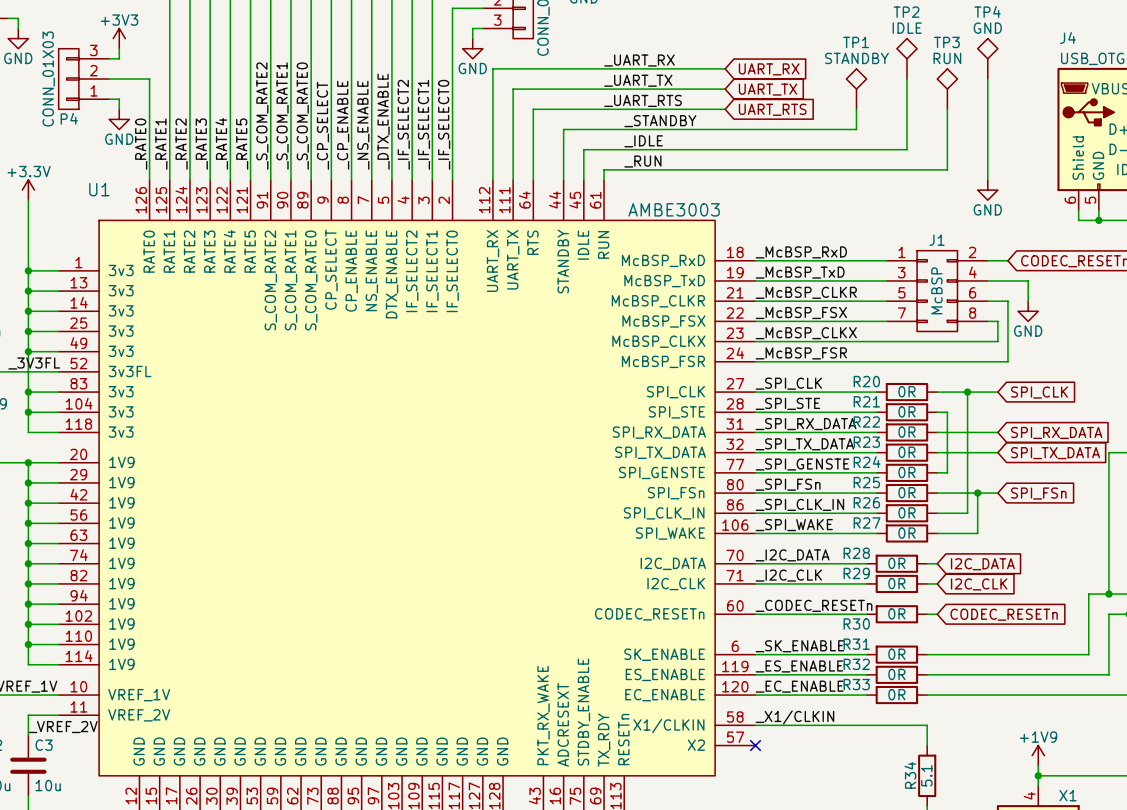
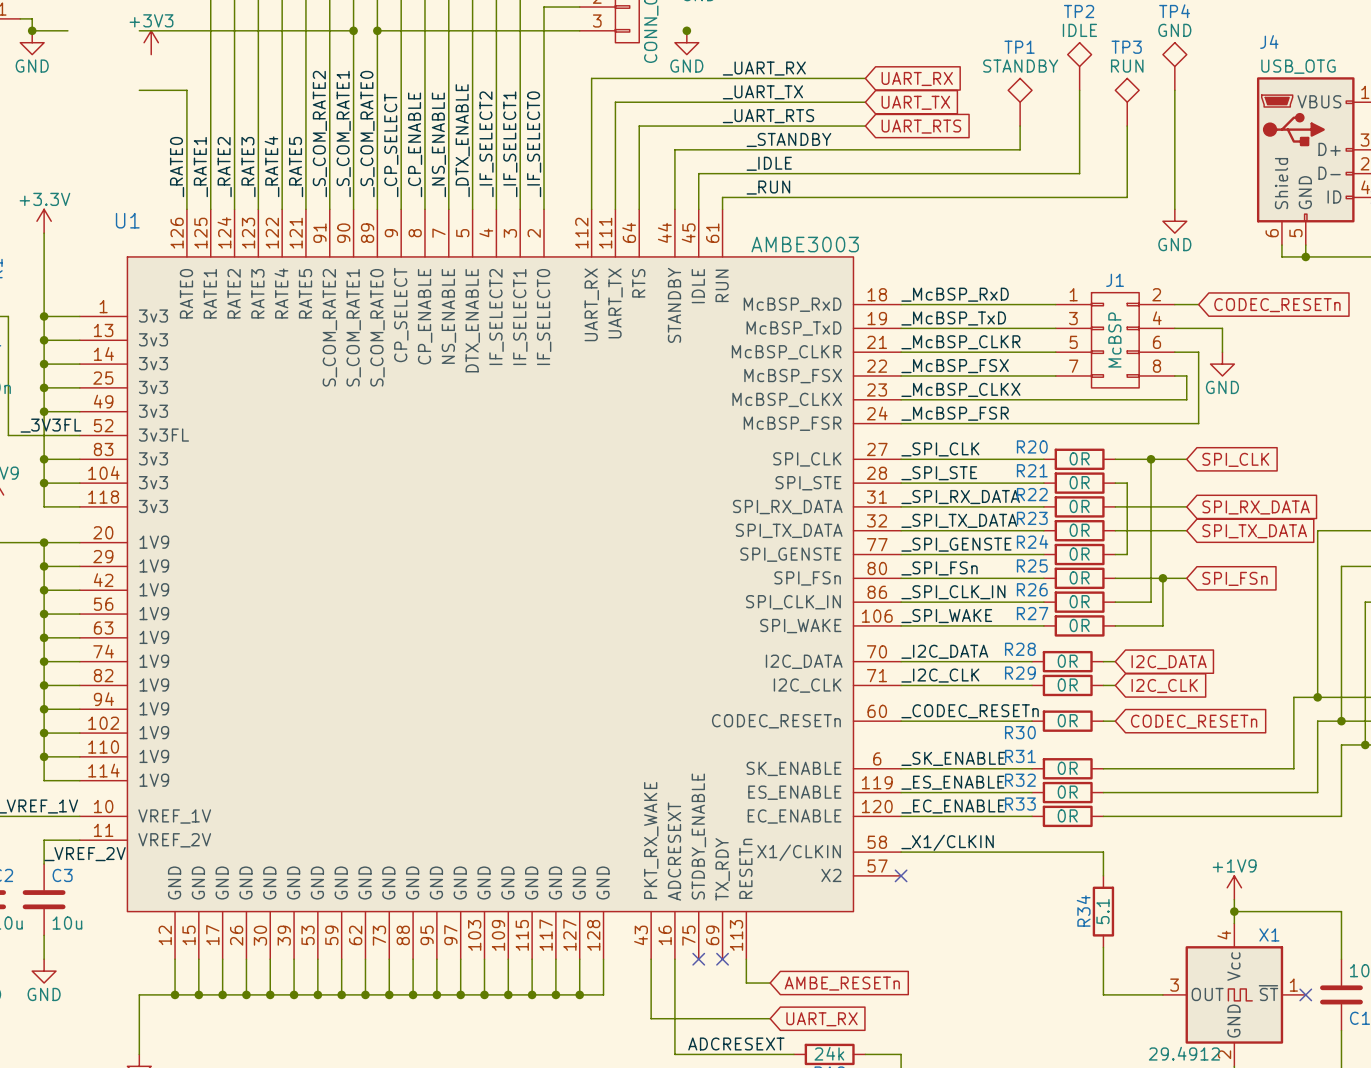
wire: none -> (32, 30) (67, 30)
junction: none -> (32, 30)
wire: none -> (139, 30) (353, 30)
junction: none -> (353, 30)
junction: none -> (377, 30)
wire: (472, 28) (472, 38) -> (567, 30) (377, 30)
junction: none -> (686, 30)
power symbol: none -> GND (686, 42)
wire: (119, 48) (119, 58) (109, 58) -> none
power symbol: GND (472, 48) -> none
P4: CONN_01X03 (83, 79) -> none
wire: (109, 99) (119, 99) (119, 109) -> none
power symbol: GND (119, 119) -> none

